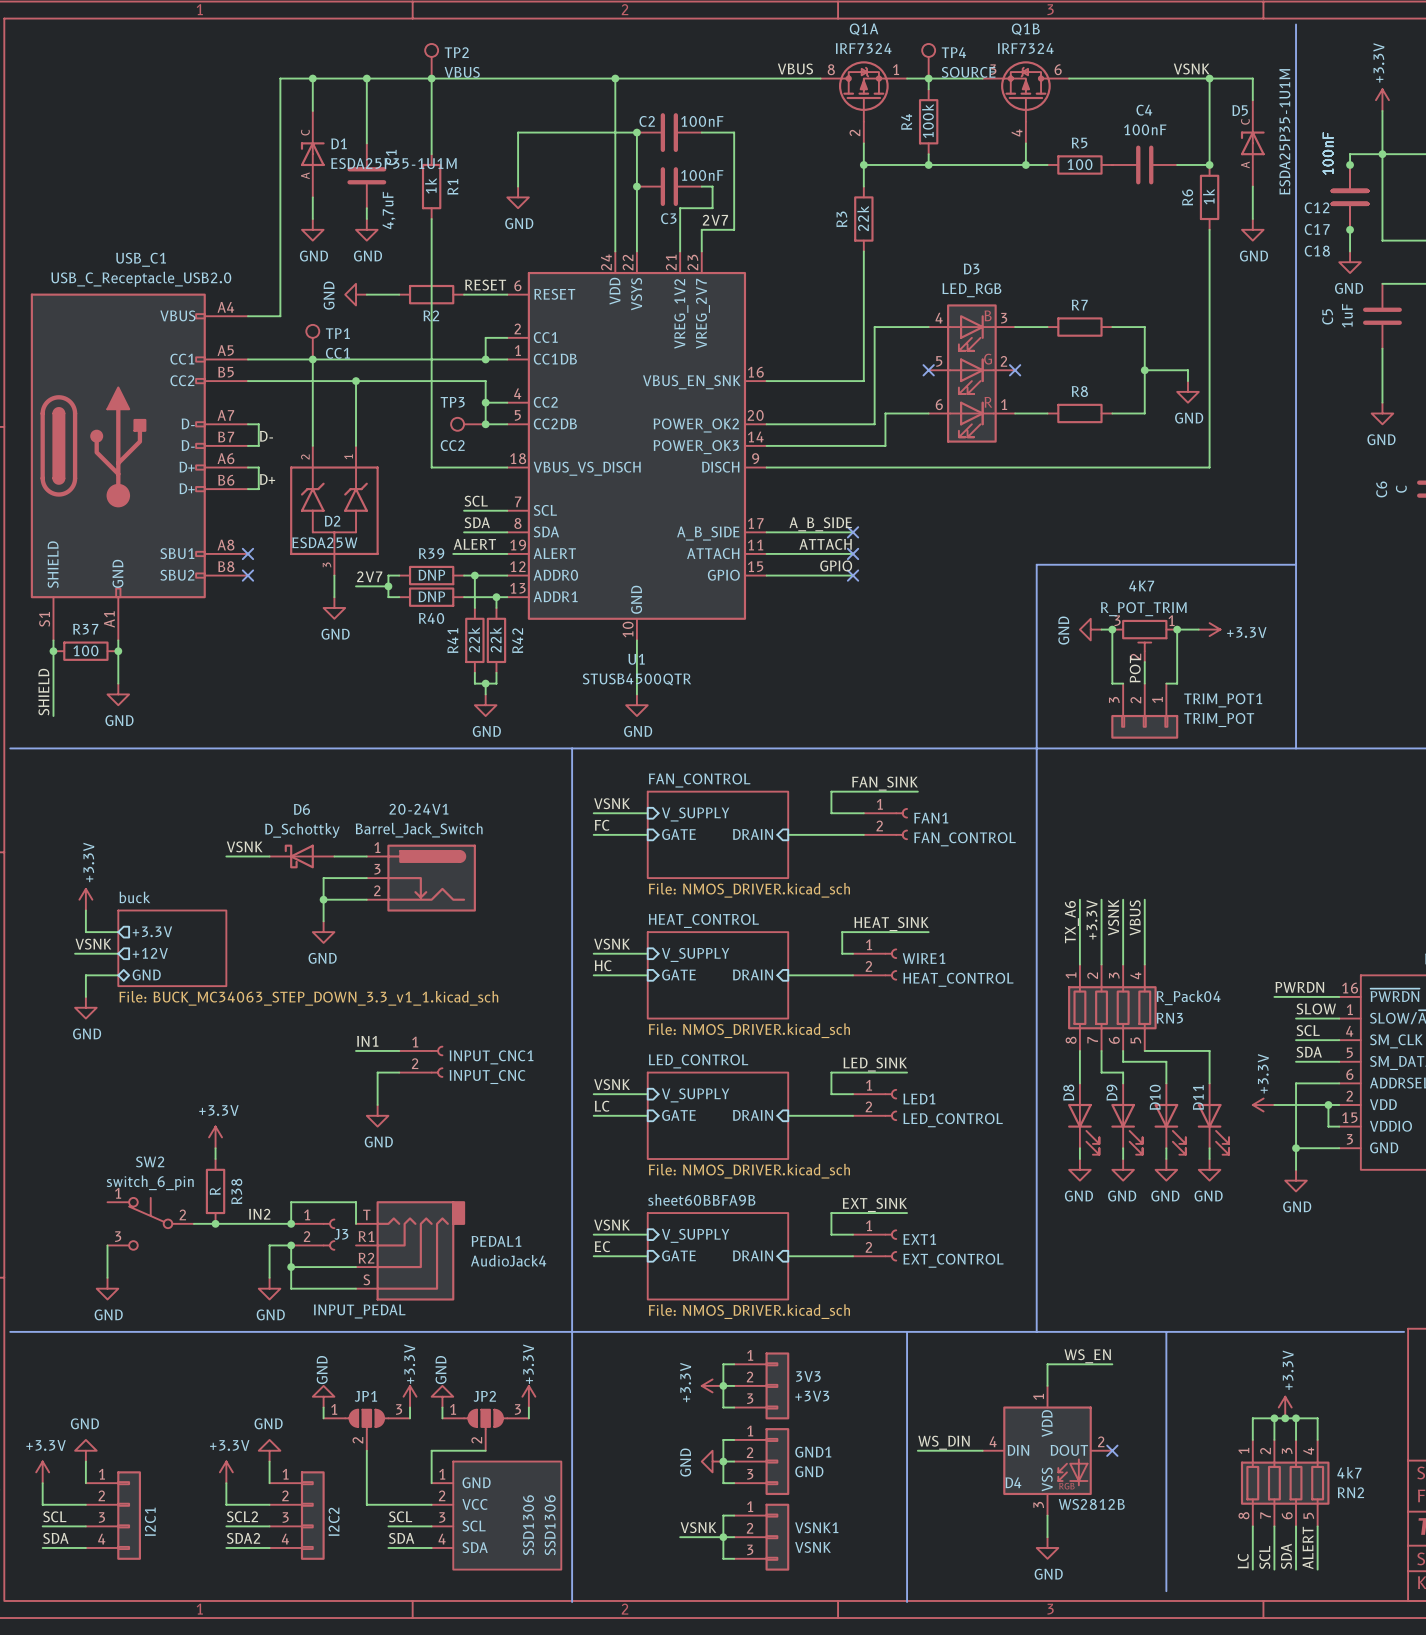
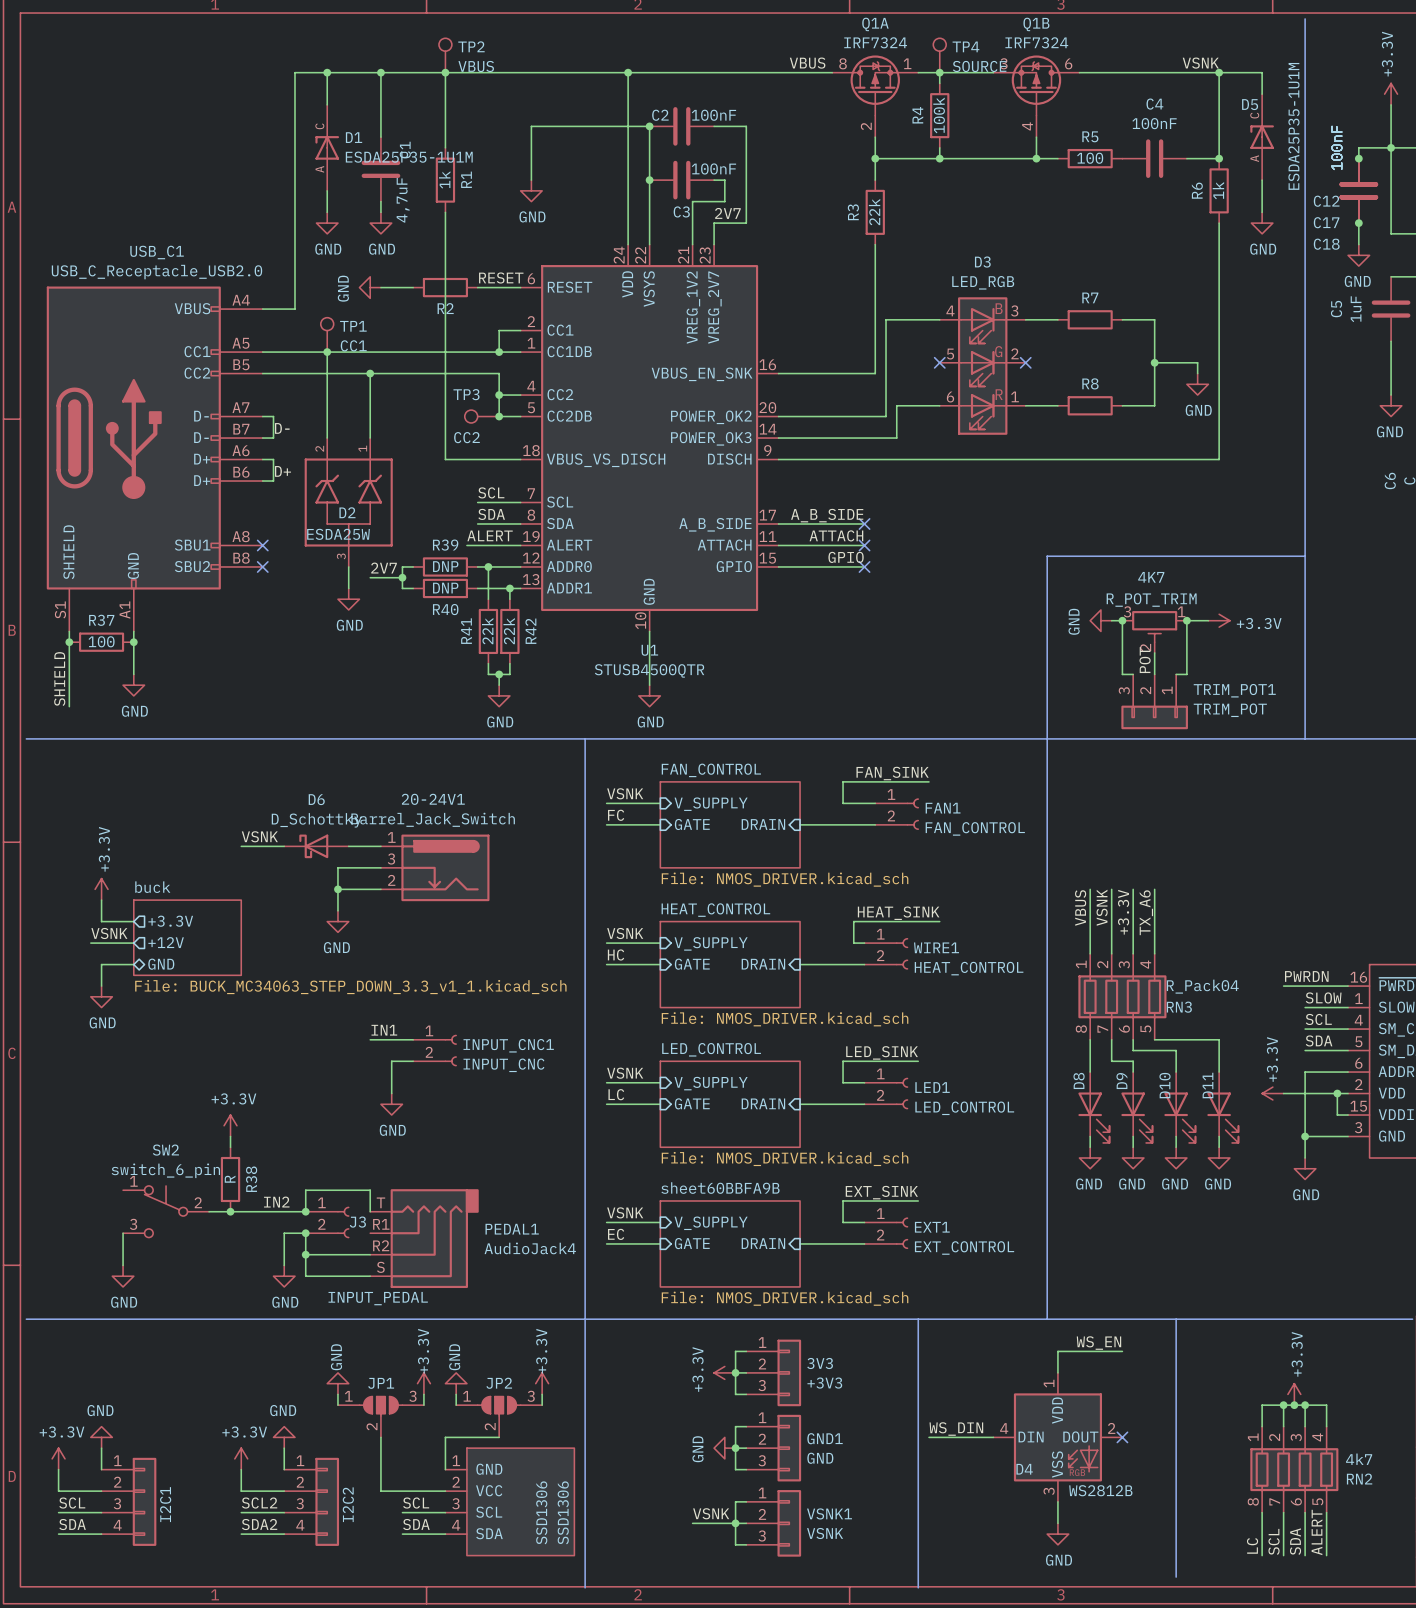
label: VSNK (1113, 917) -> +3.3V (1123, 912)
label: VBUS (1135, 917) -> TX_A6 (1146, 912)
label: +3.3V (1091, 919) -> VSNK (1102, 907)
label: TX_A6 (1071, 922) -> VBUS (1080, 908)

